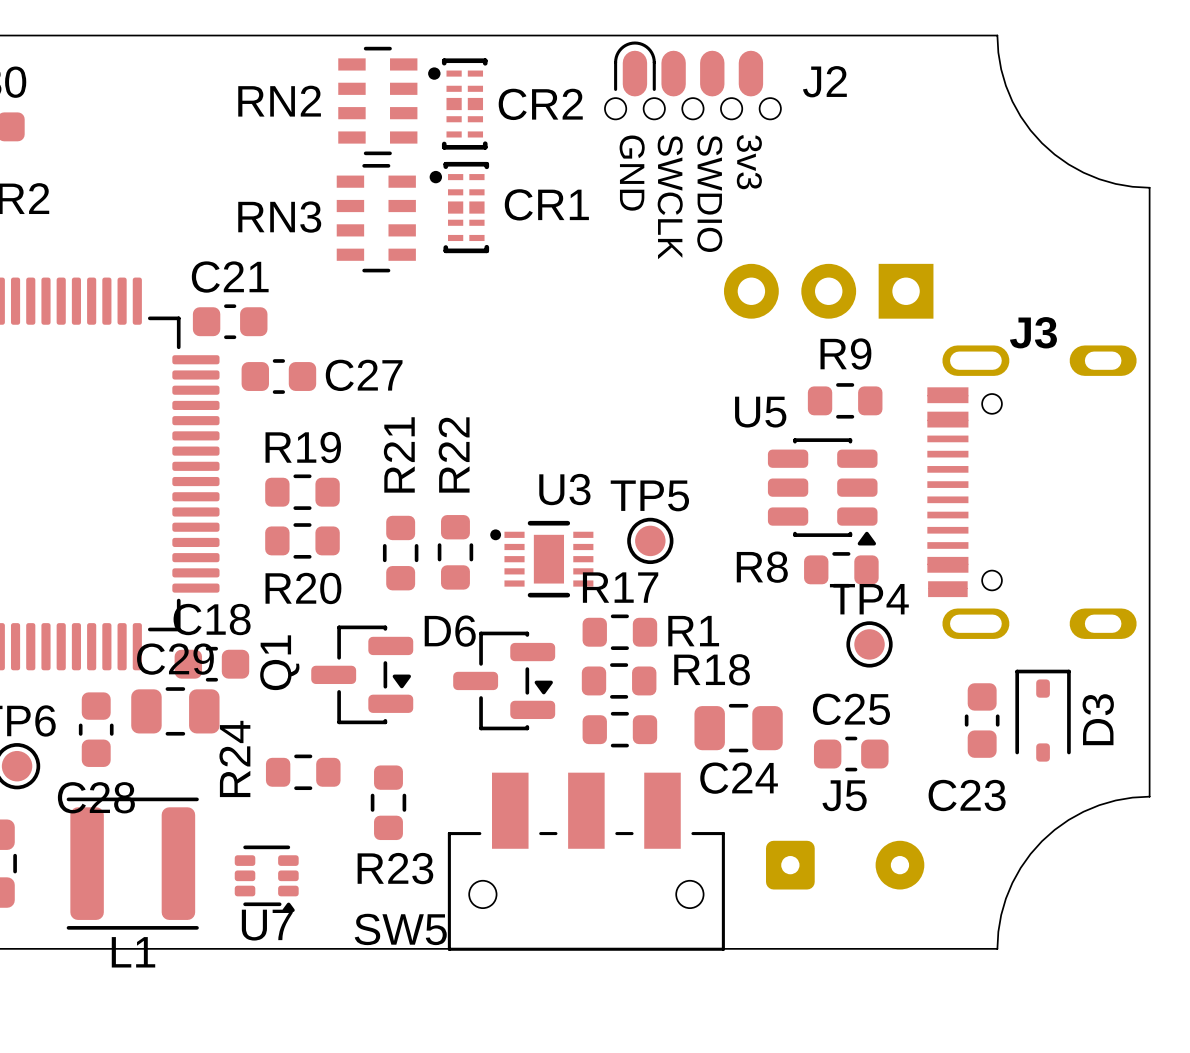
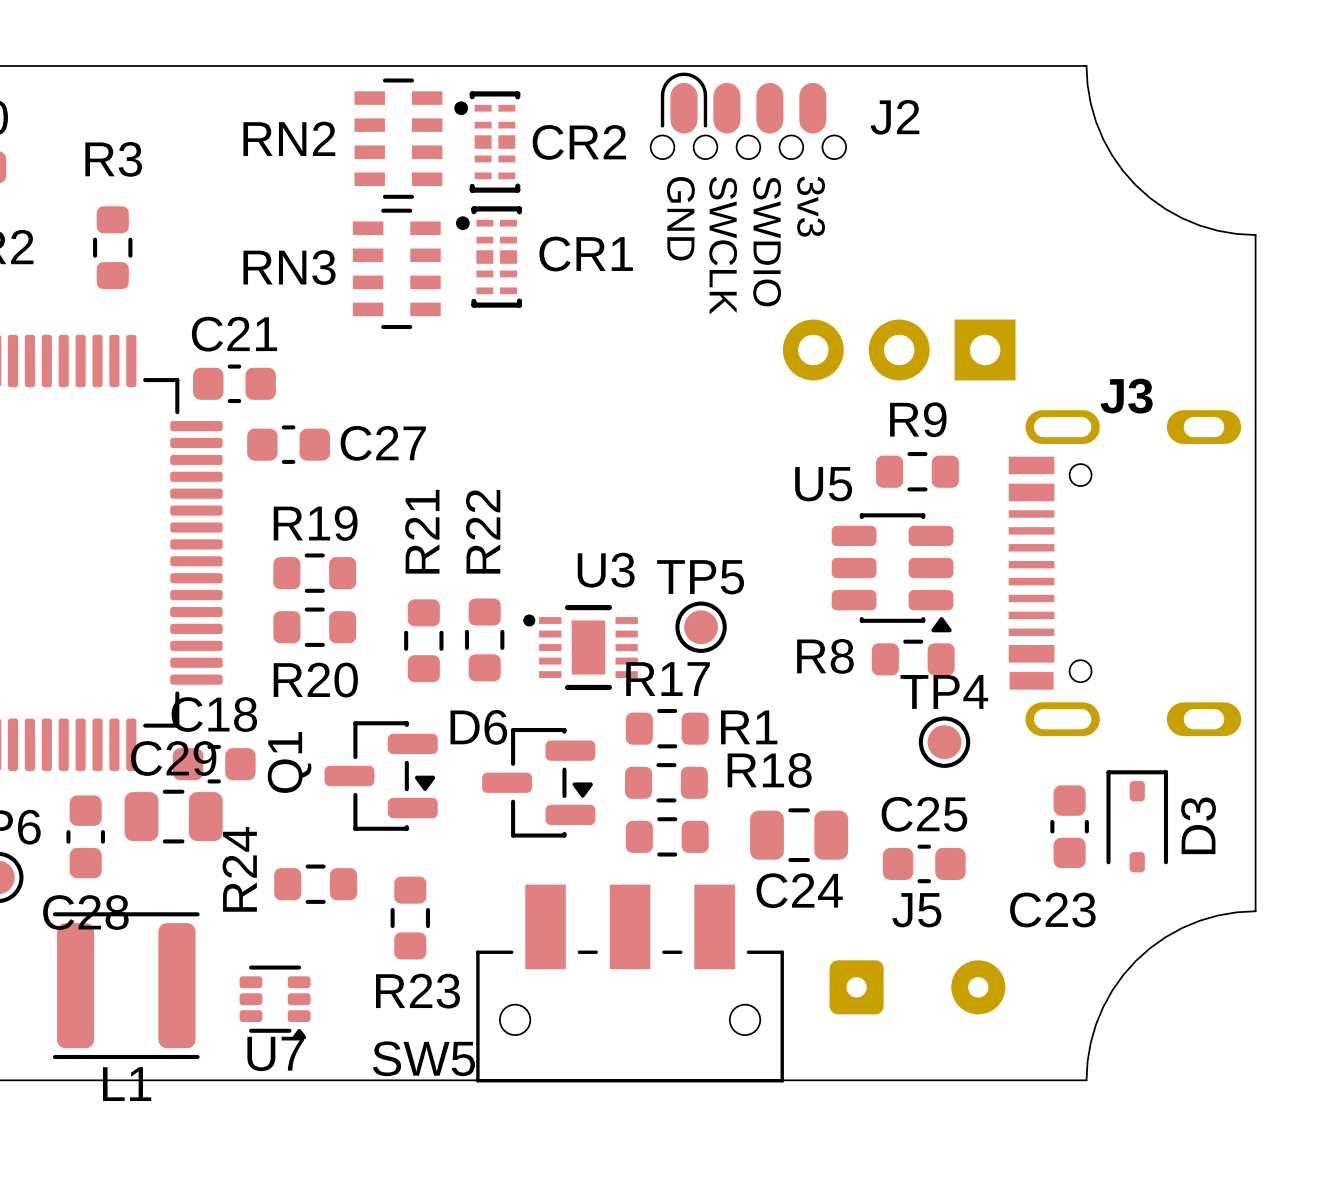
R3: none -> (112, 247)

